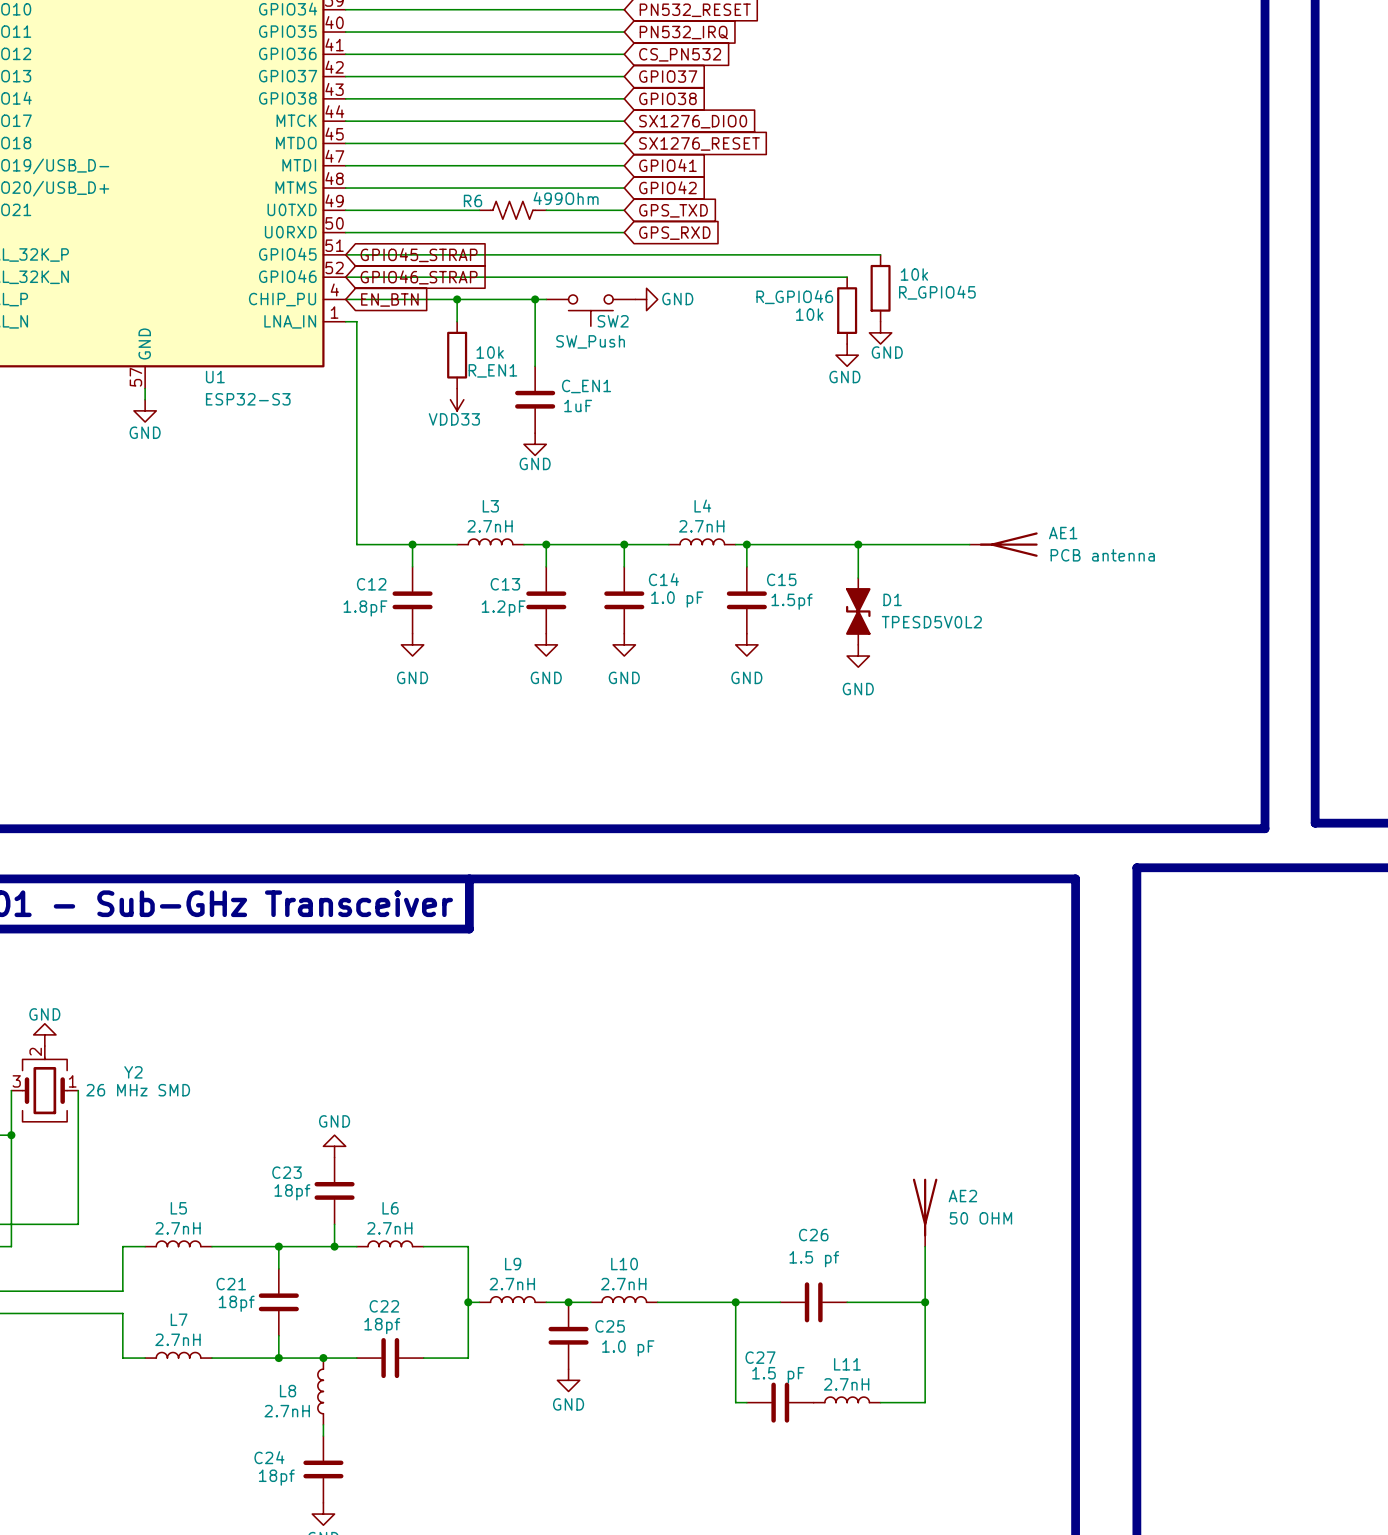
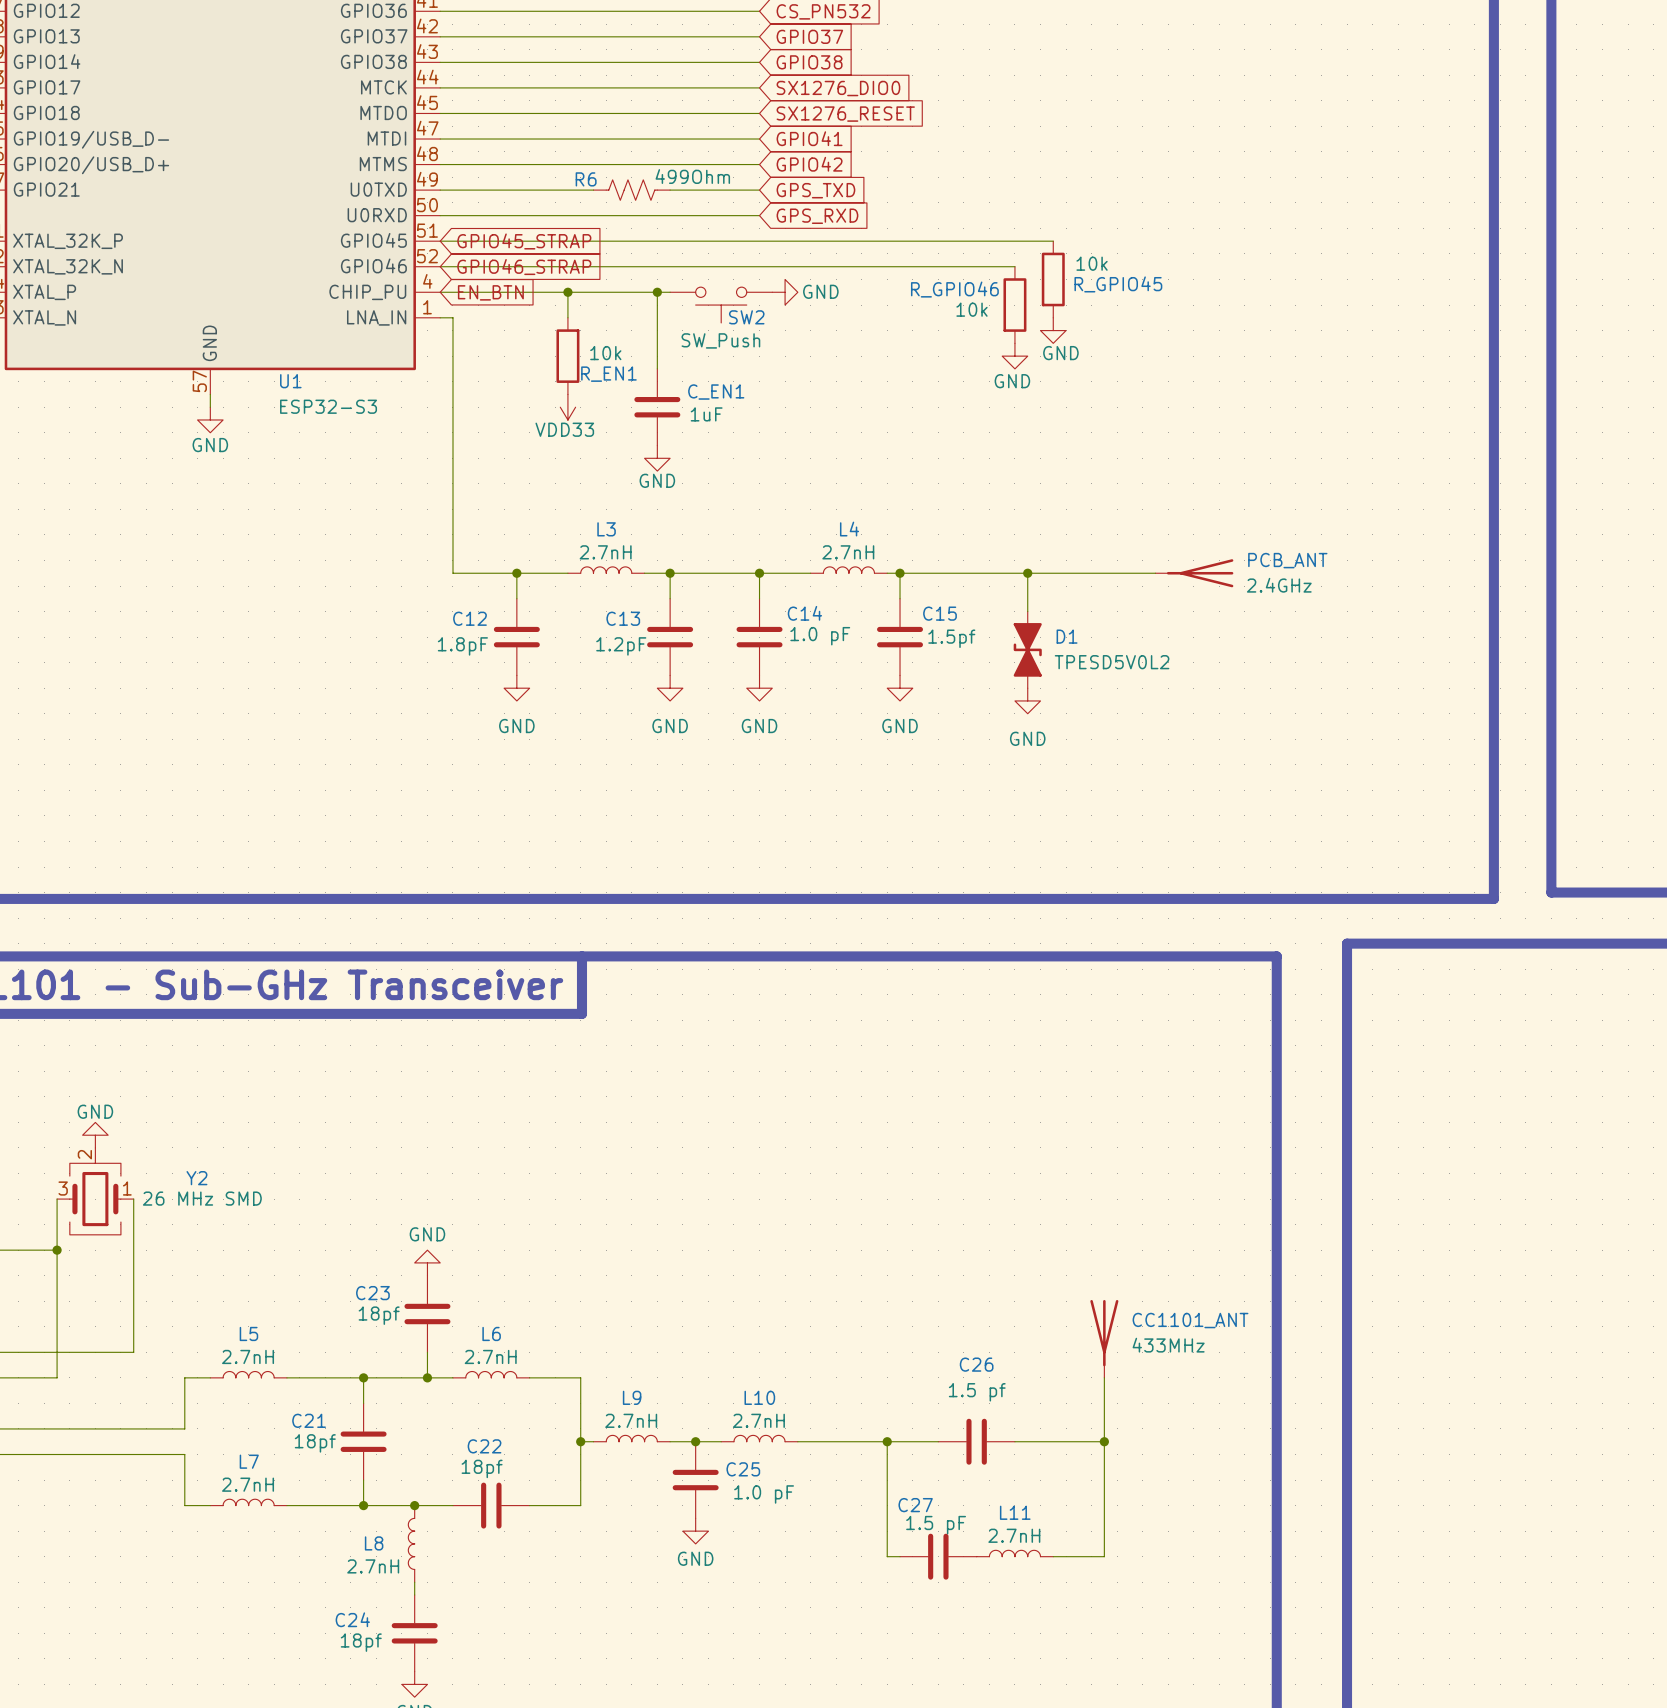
AE1 name: AE1 (1063, 533) -> PCB_ANT (1287, 560)
AE1 value: PCB antenna (1102, 555) -> 2.4GHz (1279, 585)
AE2 name: AE2 (962, 1196) -> CC1101_ANT (1190, 1320)
AE2 value: 50 OHM (980, 1218) -> 433MHz (1168, 1345)

